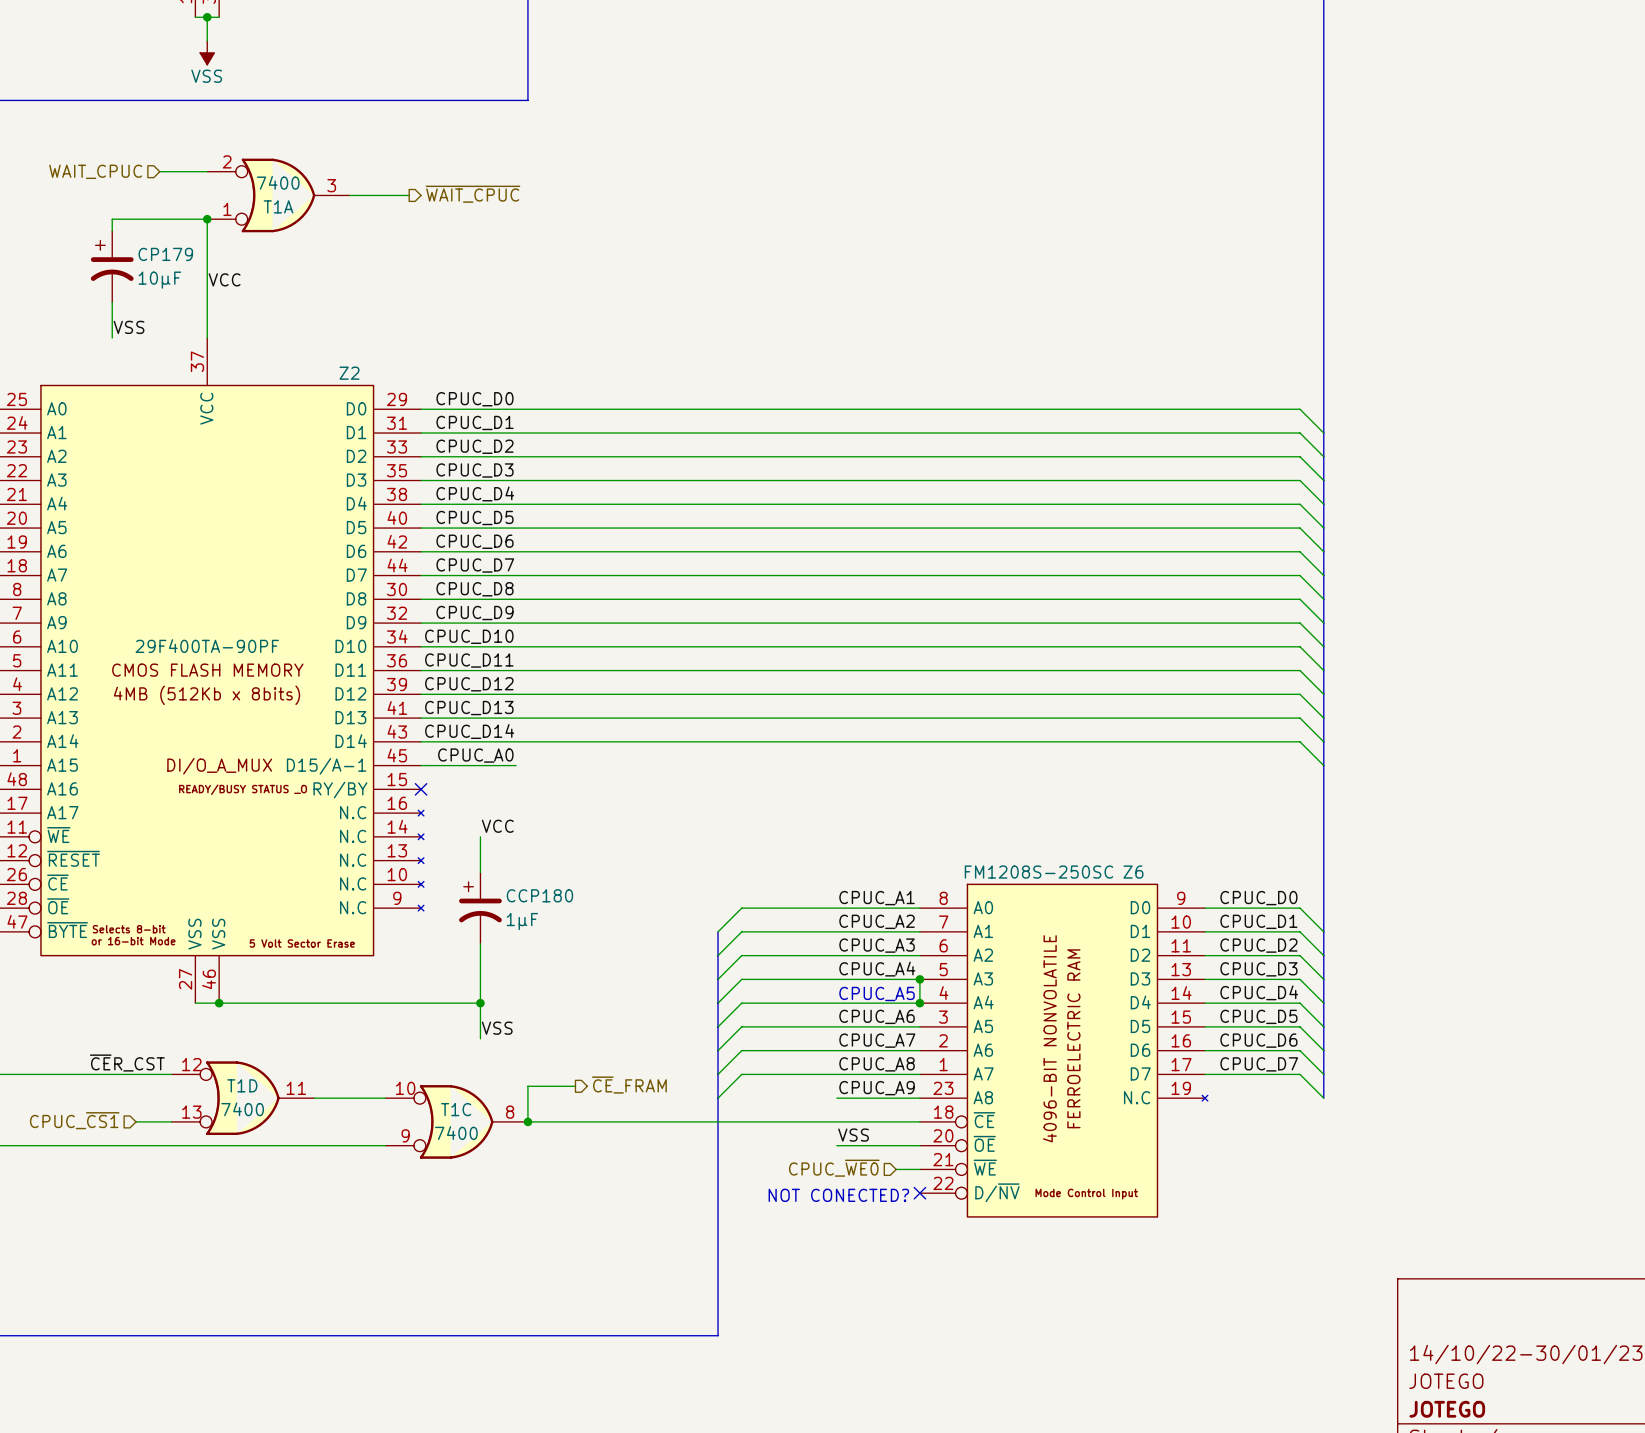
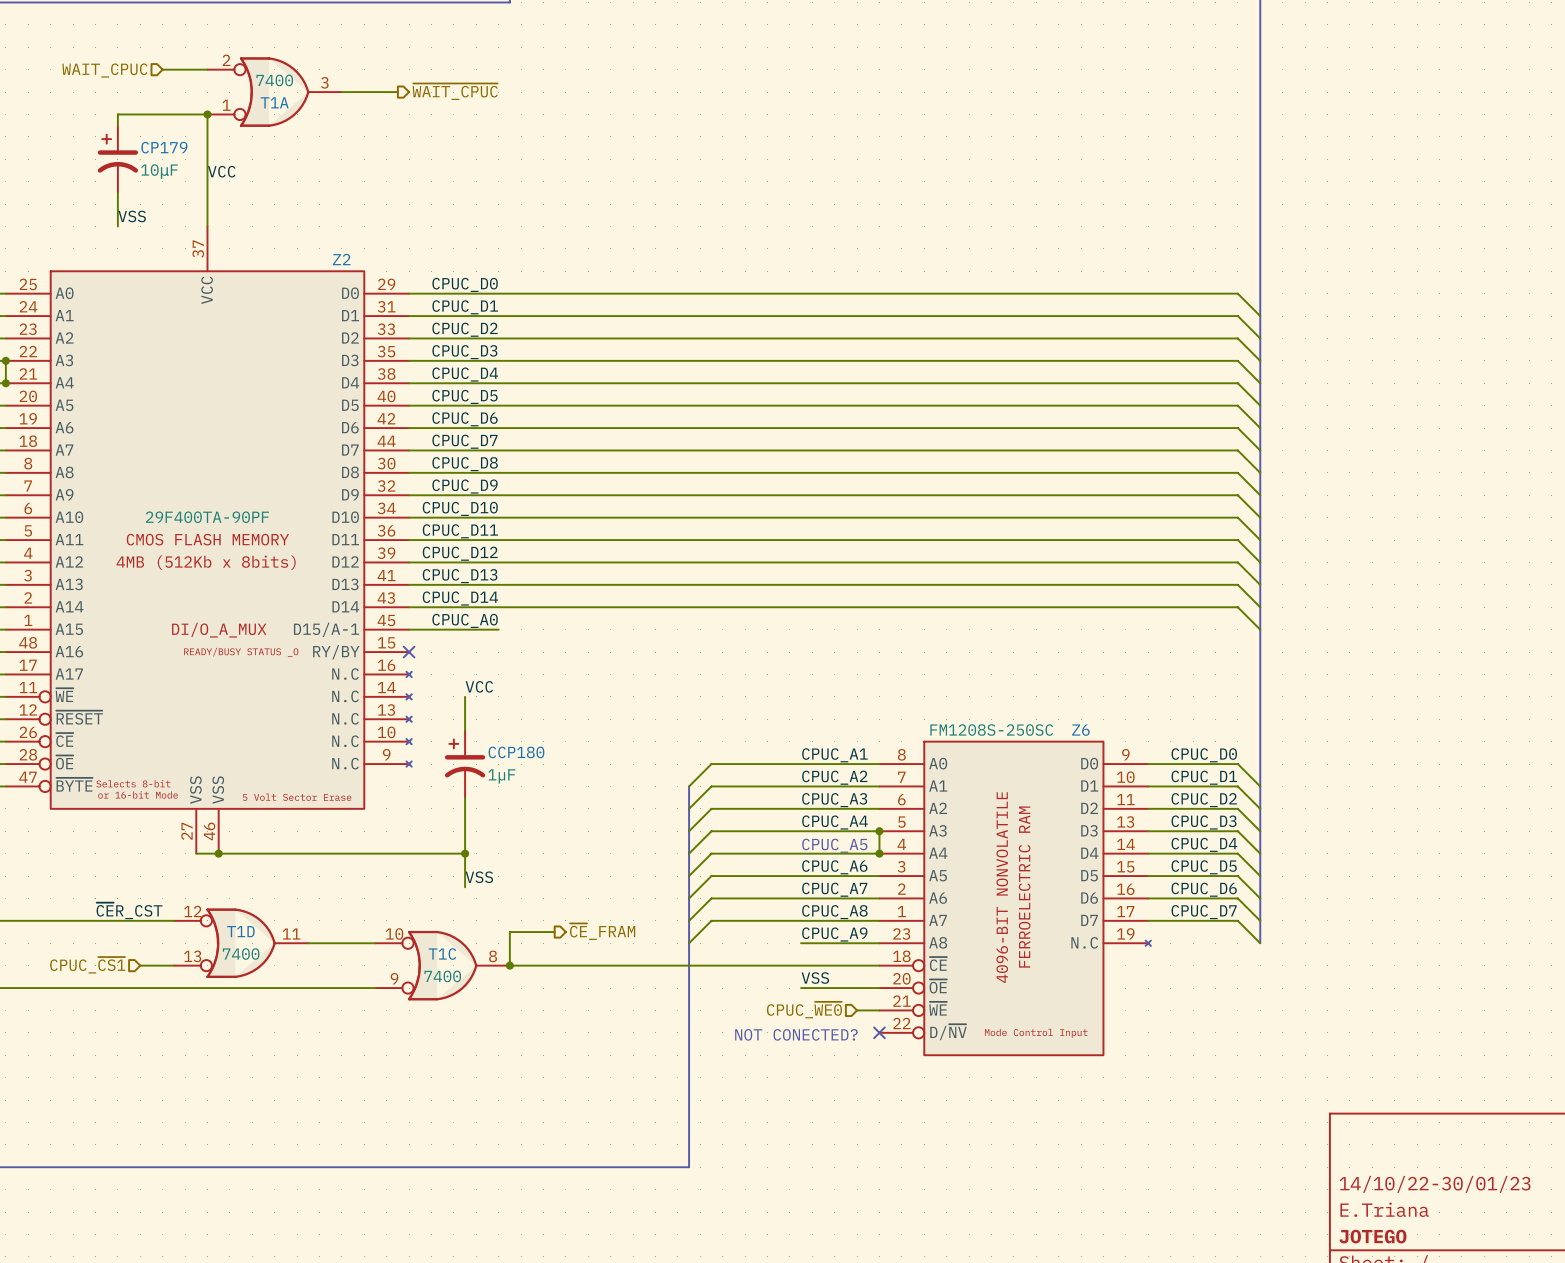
title block: JOTEGO (1446, 1381) -> E.Triana (1384, 1209)

